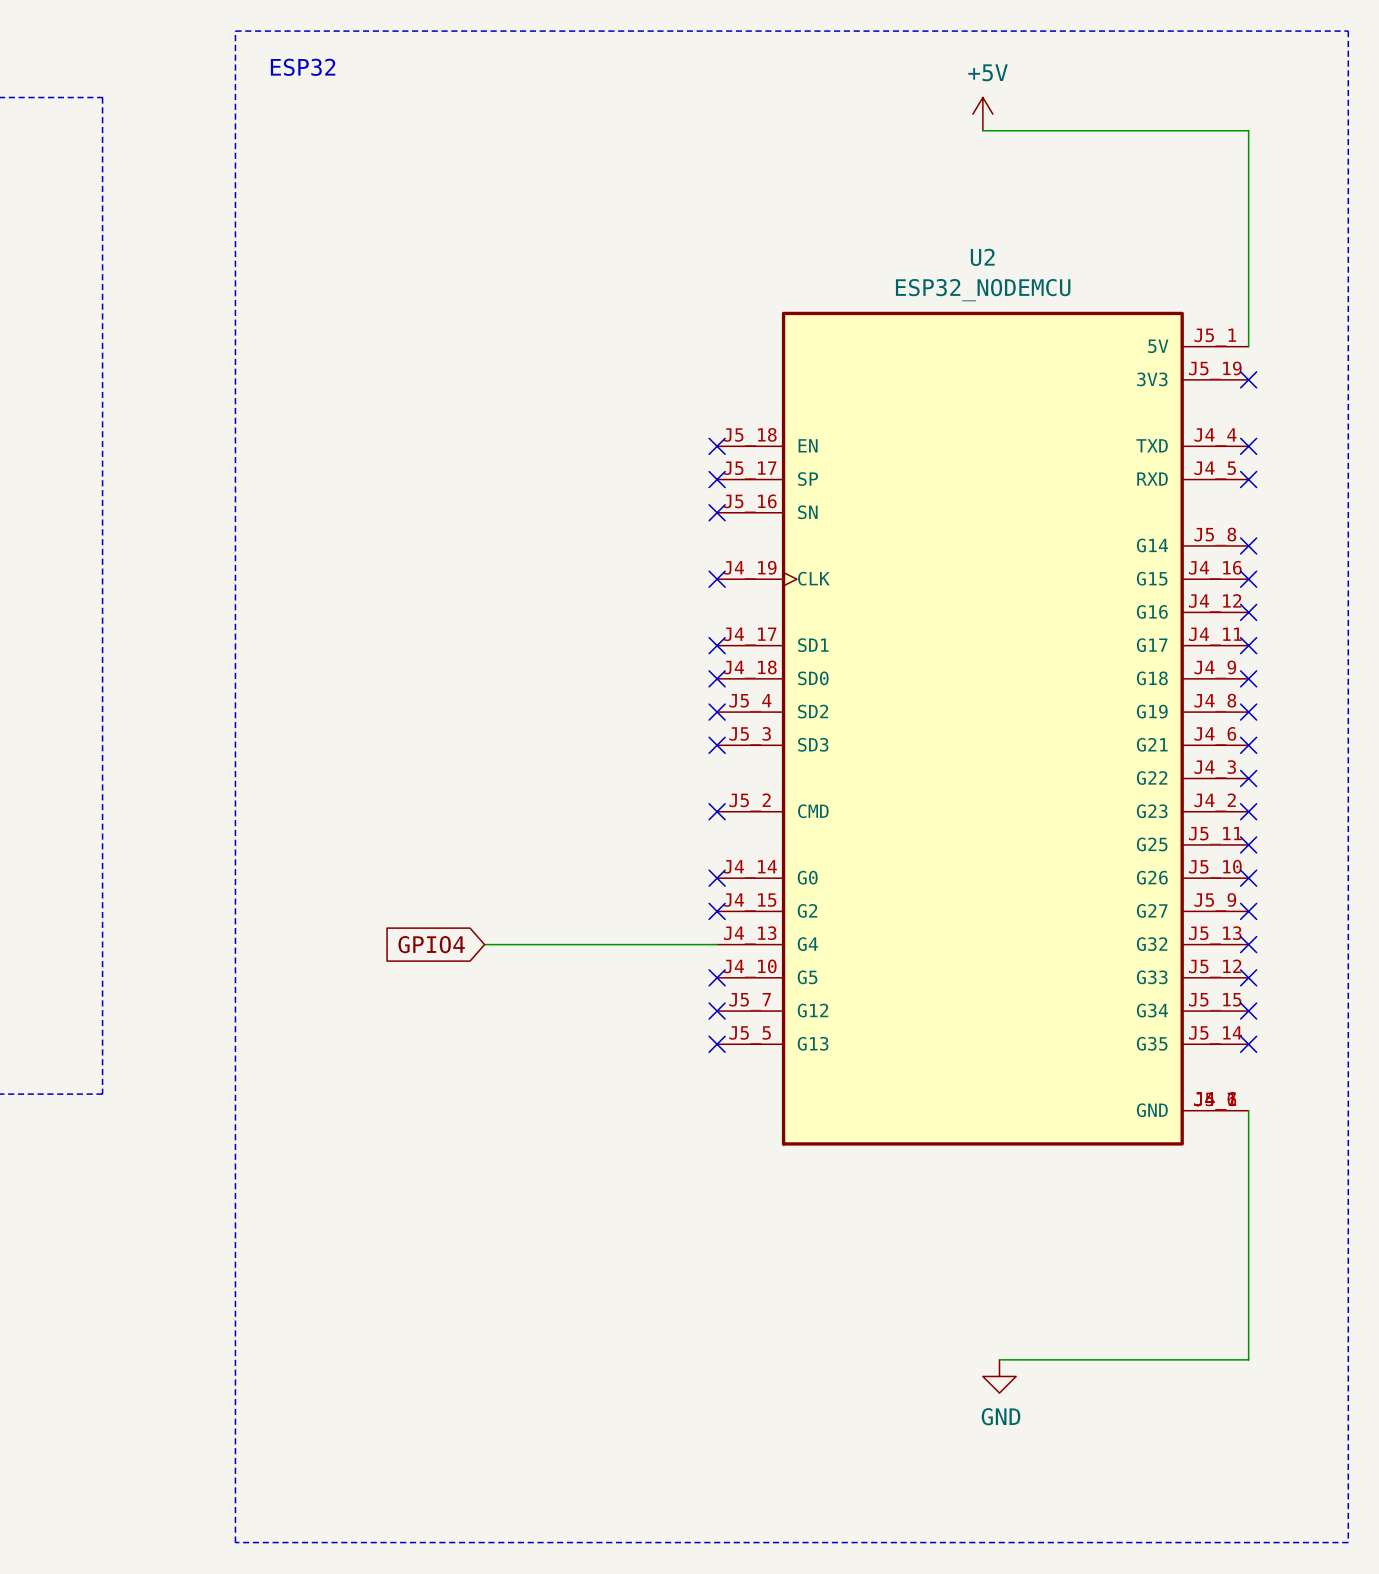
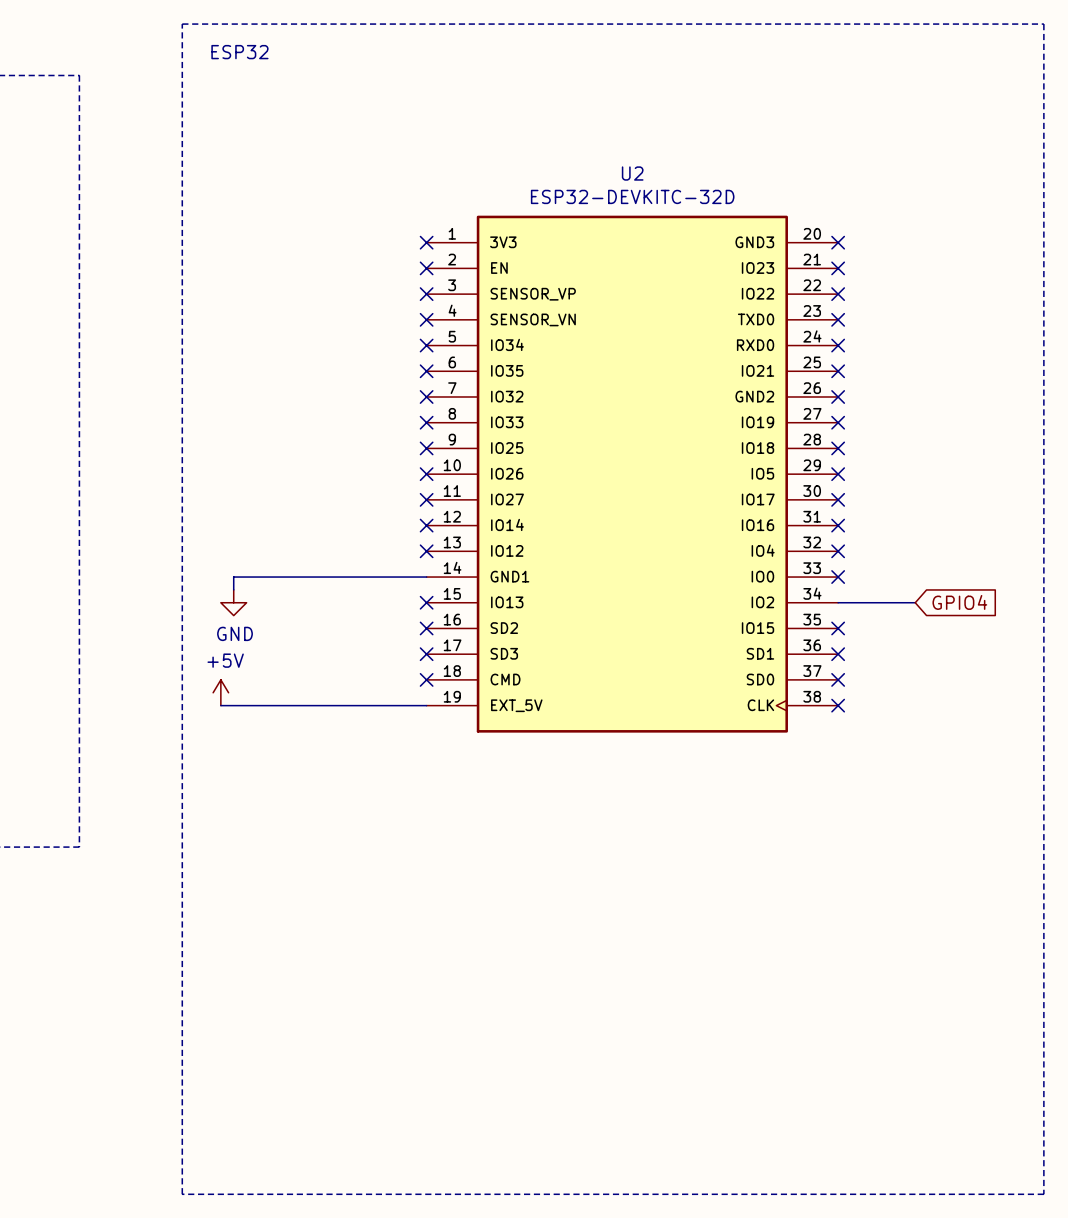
power symbol: +5V (982, 114) -> none
wire: (982, 130) (1248, 130) (1248, 346) -> none
U2 name position: U2 (982, 257) -> U2 (632, 173)
U2 value: ESP32_NODEMCU (983, 290) -> ESP32-DEVKITC-32D (632, 196)
U2 symbol: [717, 311, 1249, 1146] -> [426, 215, 839, 733]
no-connect mark: none -> (426, 242)
no-connect mark: none -> (838, 242)
no-connect mark: none -> (426, 268)
no-connect mark: none -> (838, 268)
no-connect mark: none -> (426, 294)
no-connect mark: none -> (838, 294)
no-connect mark: (1248, 379) -> none
no-connect mark: none -> (426, 319)
no-connect mark: none -> (838, 319)
no-connect mark: none -> (426, 345)
no-connect mark: (717, 446) -> none
no-connect mark: none -> (838, 345)
no-connect mark: (1248, 446) -> none
no-connect mark: none -> (426, 371)
no-connect mark: (717, 479) -> none
no-connect mark: none -> (838, 371)
no-connect mark: (1248, 479) -> none
no-connect mark: none -> (426, 396)
no-connect mark: (717, 512) -> none
no-connect mark: none -> (838, 396)
no-connect mark: none -> (426, 422)
no-connect mark: none -> (838, 422)
no-connect mark: (1248, 545) -> none
no-connect mark: none -> (426, 448)
no-connect mark: (717, 579) -> none
no-connect mark: none -> (838, 448)
no-connect mark: (1248, 579) -> none
no-connect mark: none -> (426, 474)
no-connect mark: none -> (838, 474)
no-connect mark: (1248, 612) -> none
no-connect mark: none -> (426, 499)
no-connect mark: (717, 645) -> none
no-connect mark: none -> (838, 499)
no-connect mark: (1248, 645) -> none
no-connect mark: none -> (426, 525)
no-connect mark: (717, 678) -> none
no-connect mark: none -> (838, 525)
no-connect mark: (1248, 678) -> none
no-connect mark: none -> (426, 551)
no-connect mark: (717, 712) -> none
no-connect mark: none -> (838, 551)
no-connect mark: (1248, 712) -> none
wire: none -> (426, 577) (233, 577) (233, 589)
no-connect mark: (717, 745) -> none
no-connect mark: none -> (838, 577)
no-connect mark: (1248, 745) -> none
power symbol: none -> GND (233, 602)
no-connect mark: none -> (426, 602)
global label: none -> GPIO4 (959, 602)
no-connect mark: (1248, 778) -> none
no-connect mark: none -> (426, 628)
no-connect mark: (717, 811) -> none
no-connect mark: none -> (838, 628)
no-connect mark: (1248, 811) -> none
no-connect mark: none -> (426, 654)
no-connect mark: none -> (838, 654)
no-connect mark: (1248, 844) -> none
no-connect mark: none -> (426, 679)
no-connect mark: (717, 878) -> none
no-connect mark: none -> (838, 679)
no-connect mark: (1248, 878) -> none
power symbol: none -> +5V (220, 692)
wire: none -> (220, 705) (426, 705)
no-connect mark: (717, 911) -> none
no-connect mark: none -> (838, 705)
no-connect mark: (1248, 911) -> none
global label: GPIO4 (431, 944) -> none
wire: (484, 944) (717, 944) -> none
no-connect mark: (1248, 944) -> none
no-connect mark: (717, 977) -> none
no-connect mark: (1248, 977) -> none
no-connect mark: (717, 1011) -> none
no-connect mark: (1248, 1011) -> none
no-connect mark: (717, 1044) -> none
no-connect mark: (1248, 1044) -> none
wire: (1248, 1110) (1248, 1359) (999, 1359) -> none
power symbol: GND (999, 1376) -> none

